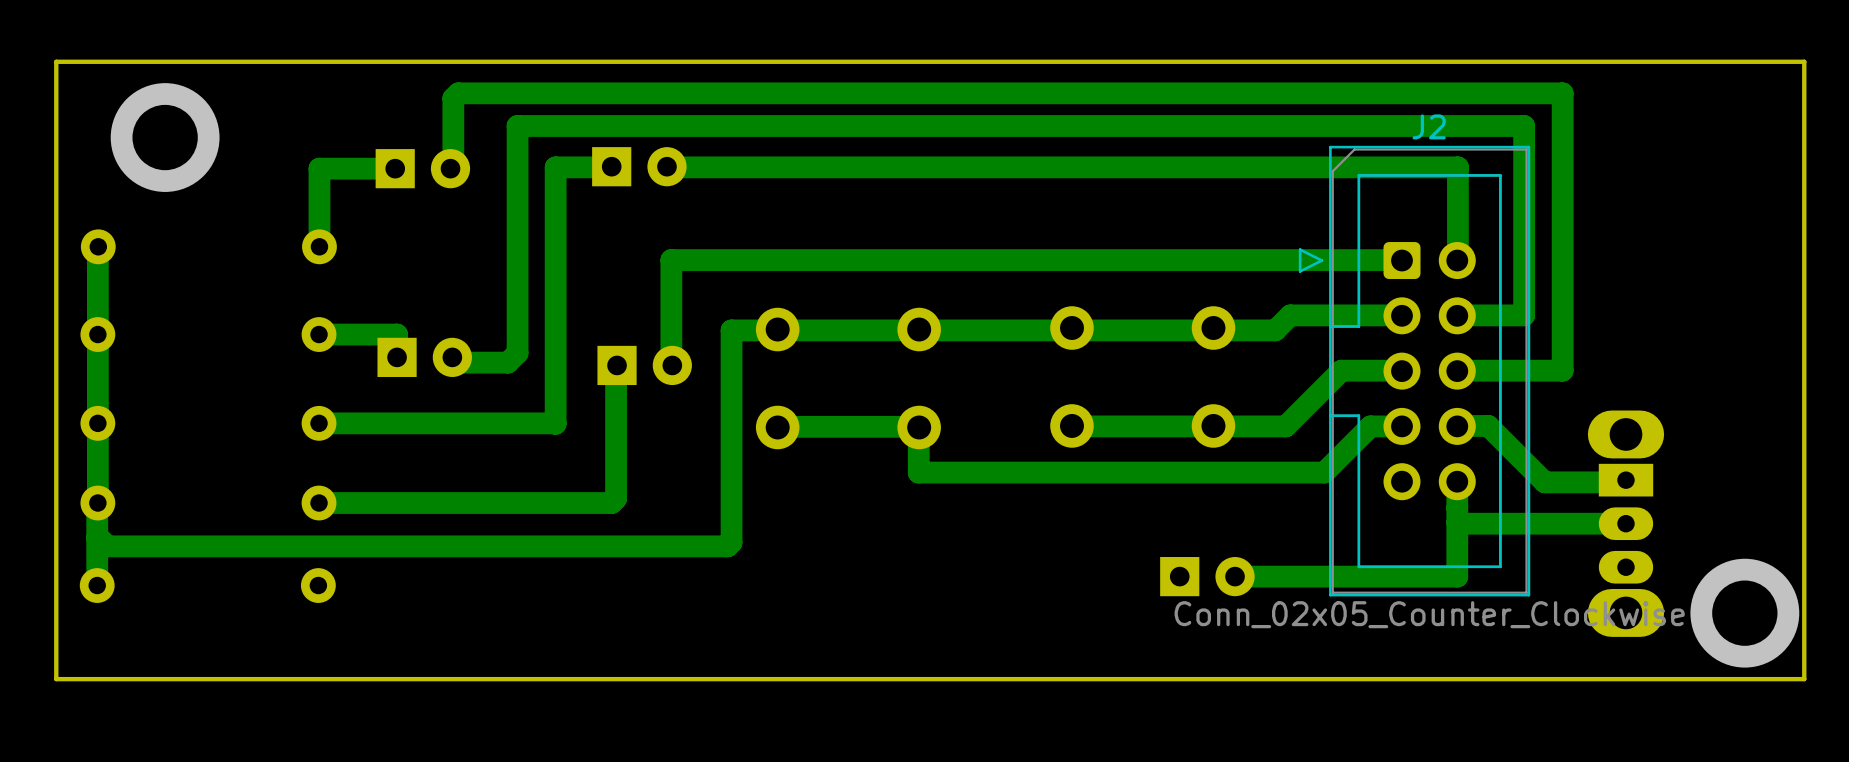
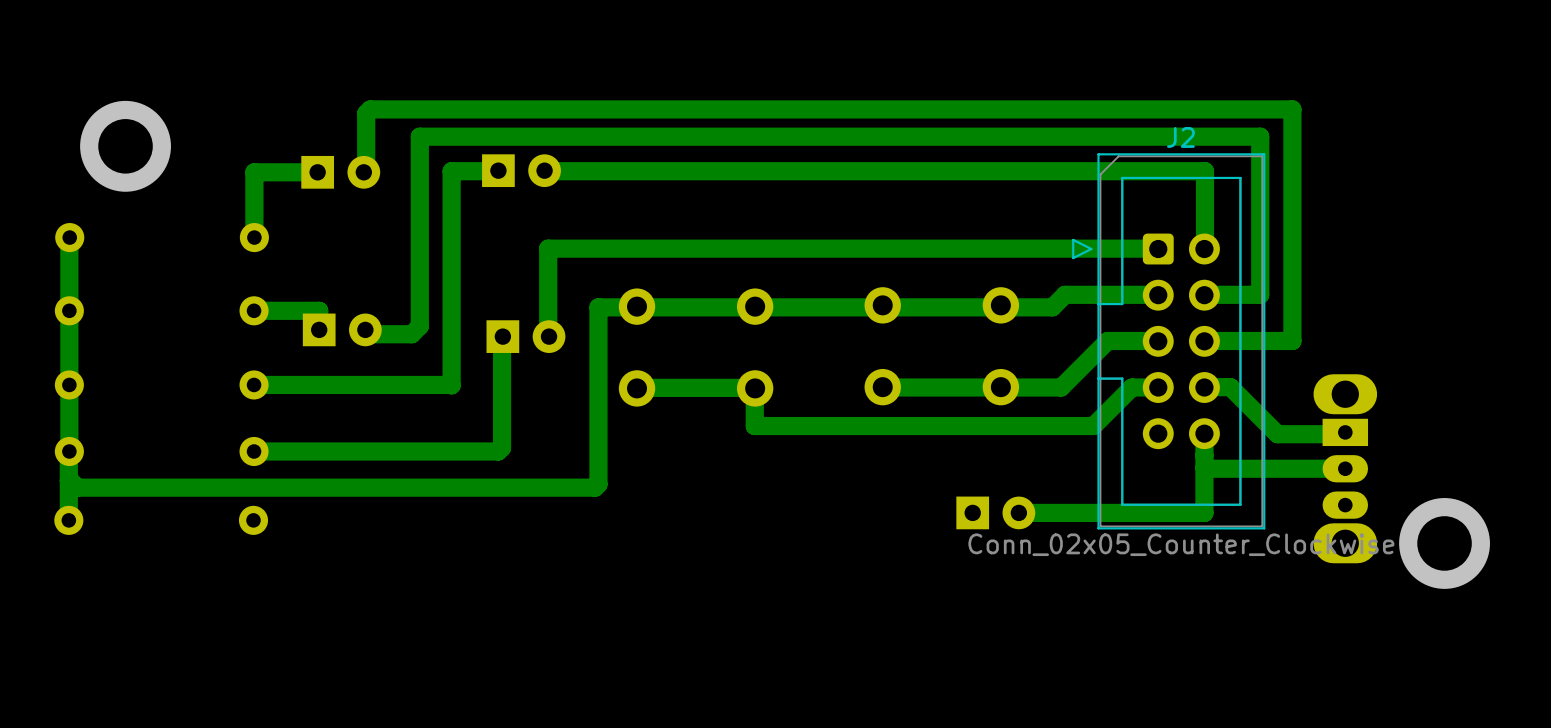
board edge: (1804, 61) (56, 61) (56, 679) (1804, 679) (1804, 61) -> none

